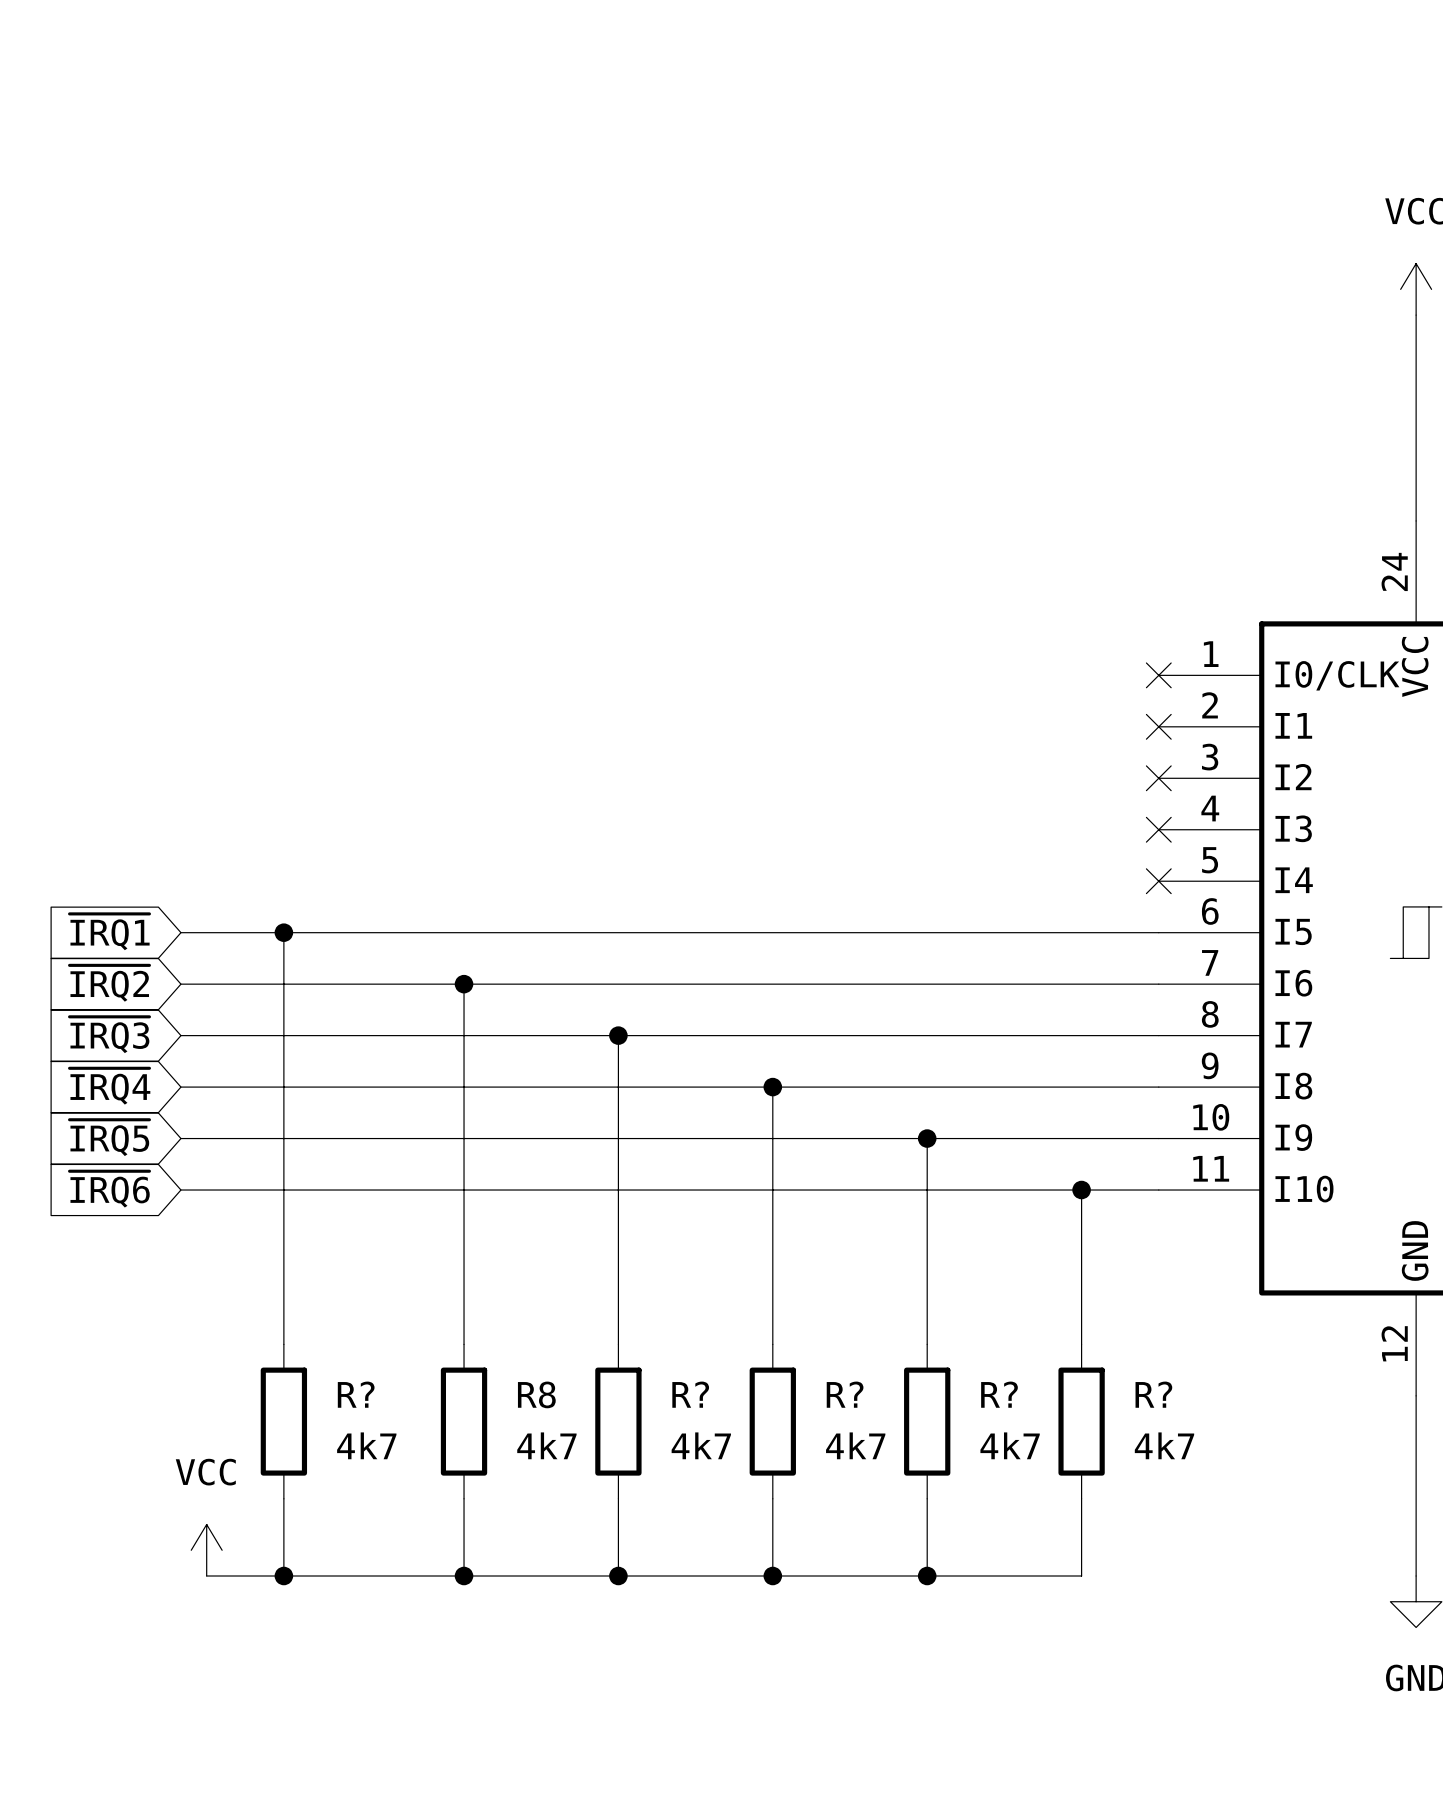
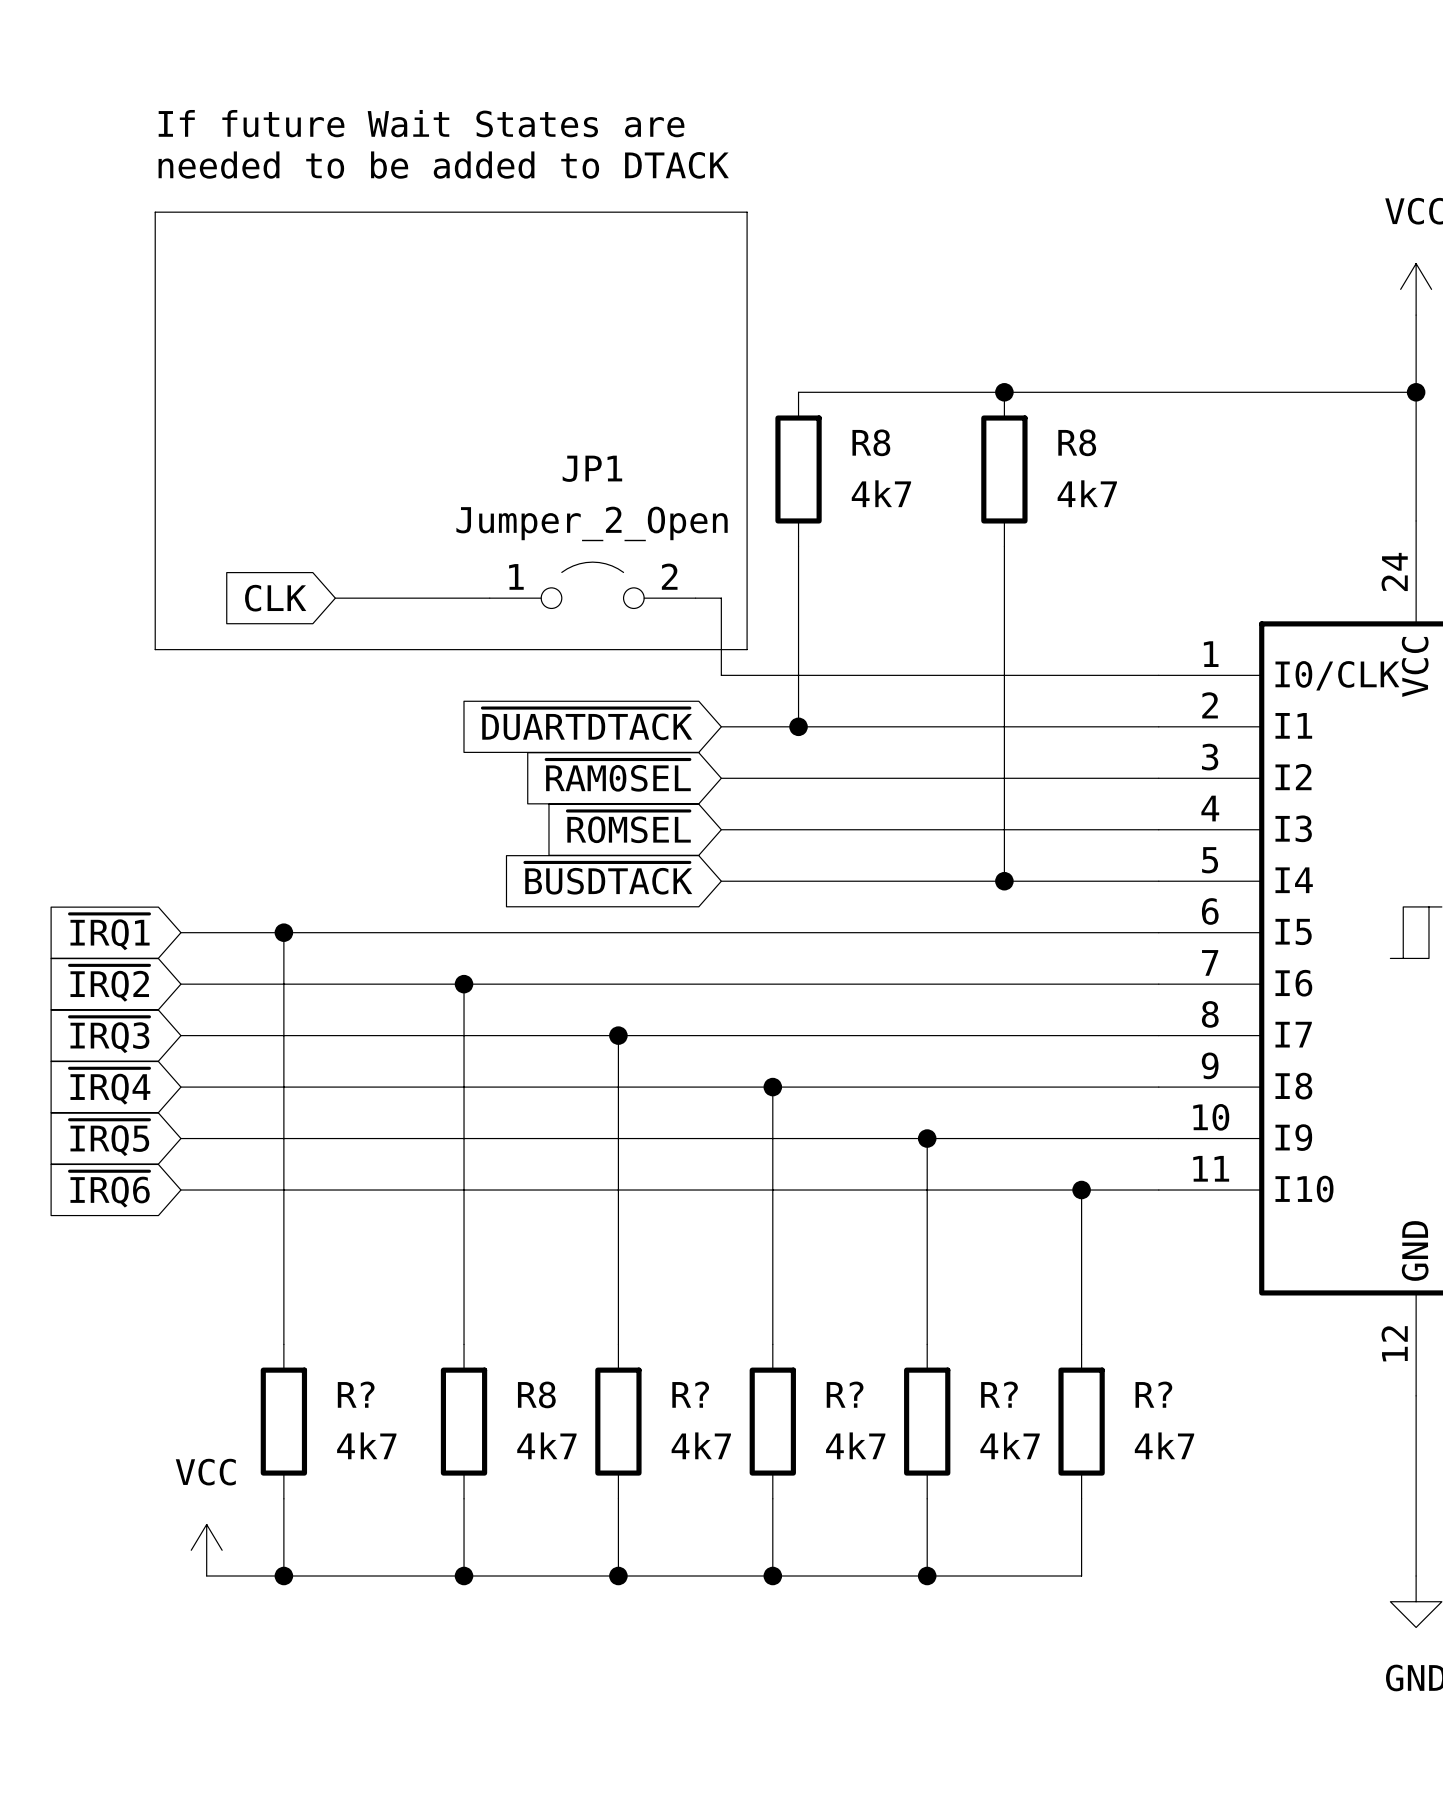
text: none -> If future Wait States are (421, 123)
text: none -> needed to be added to DTACK (443, 165)
line: none -> (155, 212) (747, 212) (747, 649) (155, 649) (155, 212)
wire: none -> (798, 392) (1416, 392)
junction: none -> (1004, 392)
junction: none -> (1416, 392)
R8: none -> 4k7 (798, 469)
R8: none -> 4k7 (1004, 469)
wire: none -> (798, 546) (798, 726)
wire: none -> (1004, 546) (1004, 881)
JP1: none -> Jumper_2_Open (592, 585)
global label: none -> CLK (275, 598)
wire: none -> (335, 598) (489, 598)
wire: none -> (695, 598) (721, 598) (721, 675) (1158, 675)
no-connect mark: (1158, 675) -> none
global label: none -> ~{DUARTDTACK} (587, 724)
wire: none -> (721, 726) (1158, 726)
junction: none -> (798, 726)
no-connect mark: (1158, 726) -> none
global label: none -> ~{RAM0SEL} (618, 775)
wire: none -> (721, 778) (1158, 778)
no-connect mark: (1158, 778) -> none
global label: none -> ~{ROMSEL} (629, 827)
wire: none -> (721, 829) (1158, 829)
no-connect mark: (1158, 829) -> none
global label: none -> ~{BUSDTACK} (608, 878)
wire: none -> (721, 881) (1158, 881)
junction: none -> (1004, 881)
no-connect mark: (1158, 881) -> none

